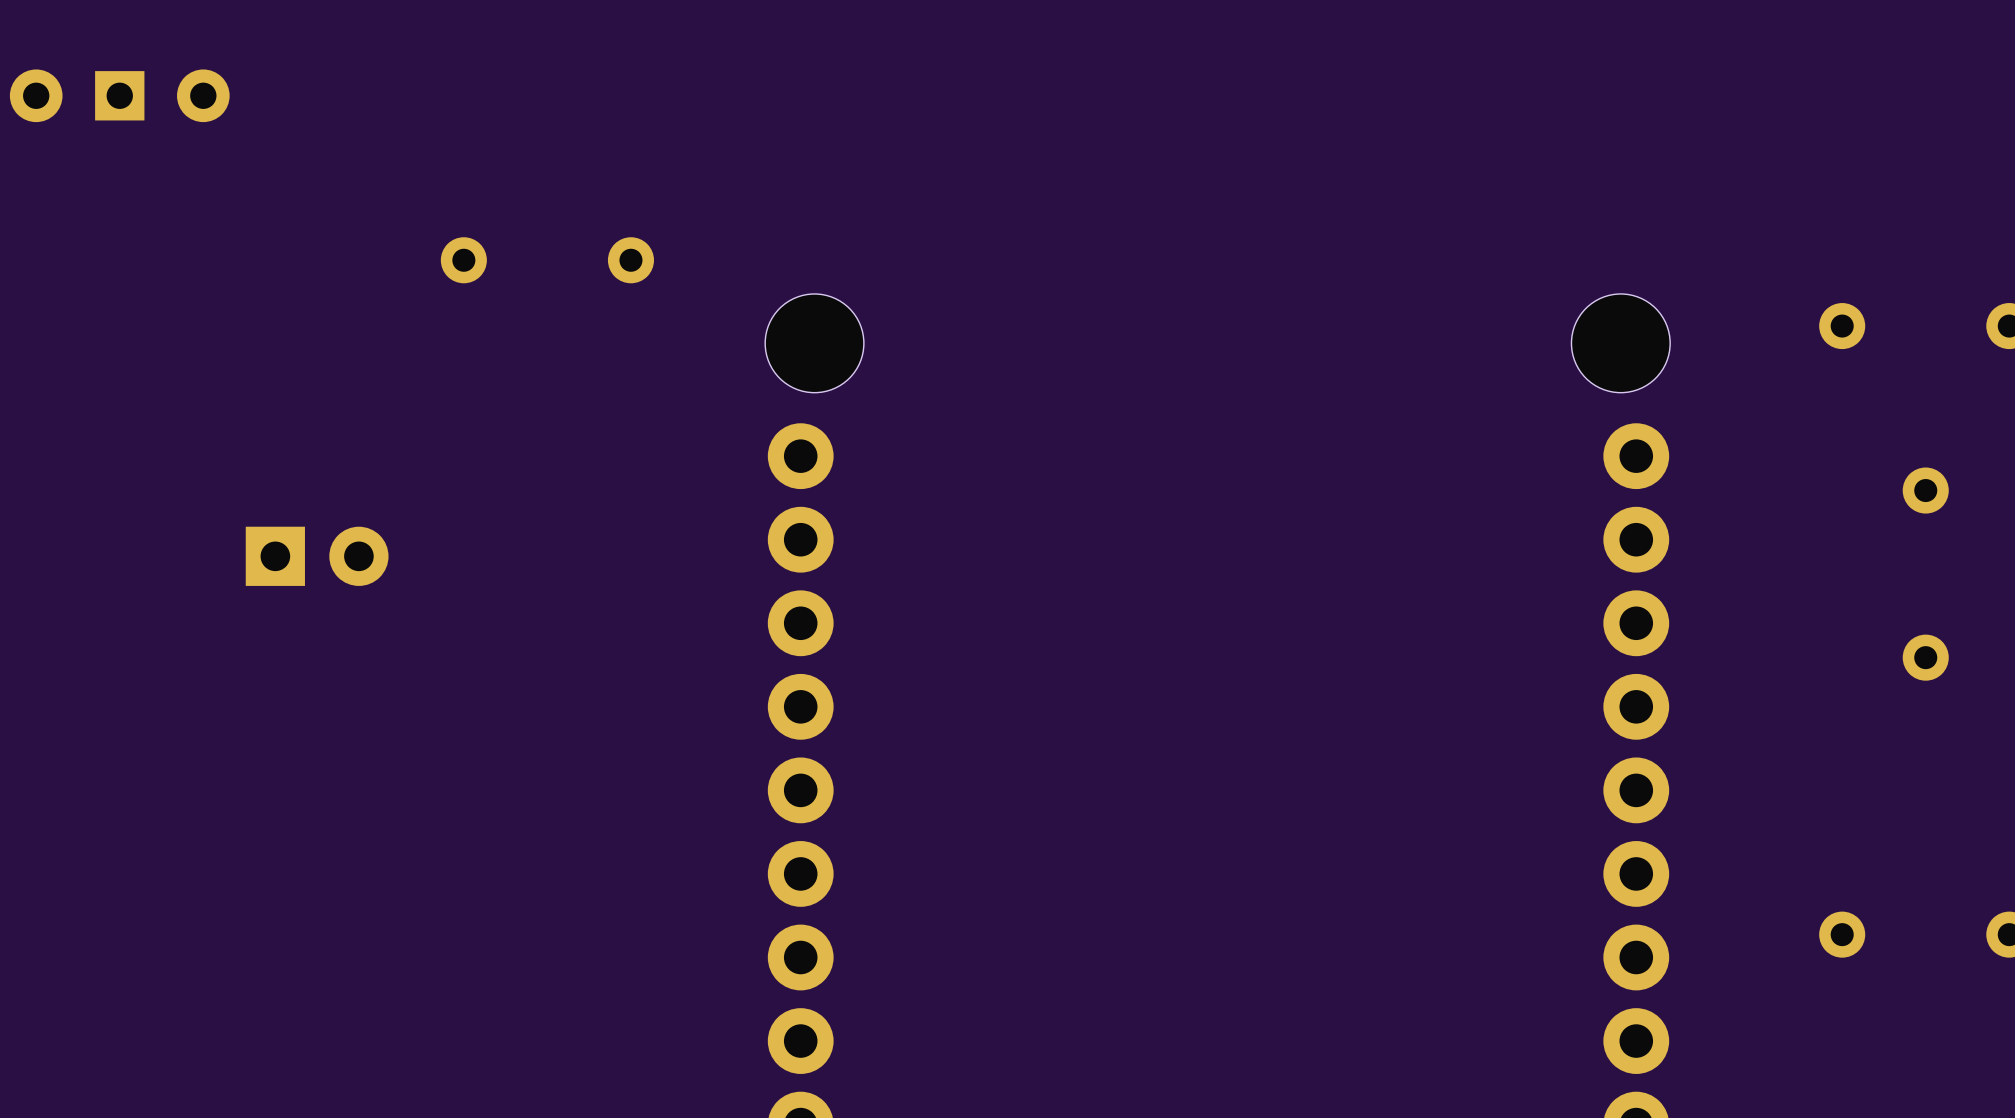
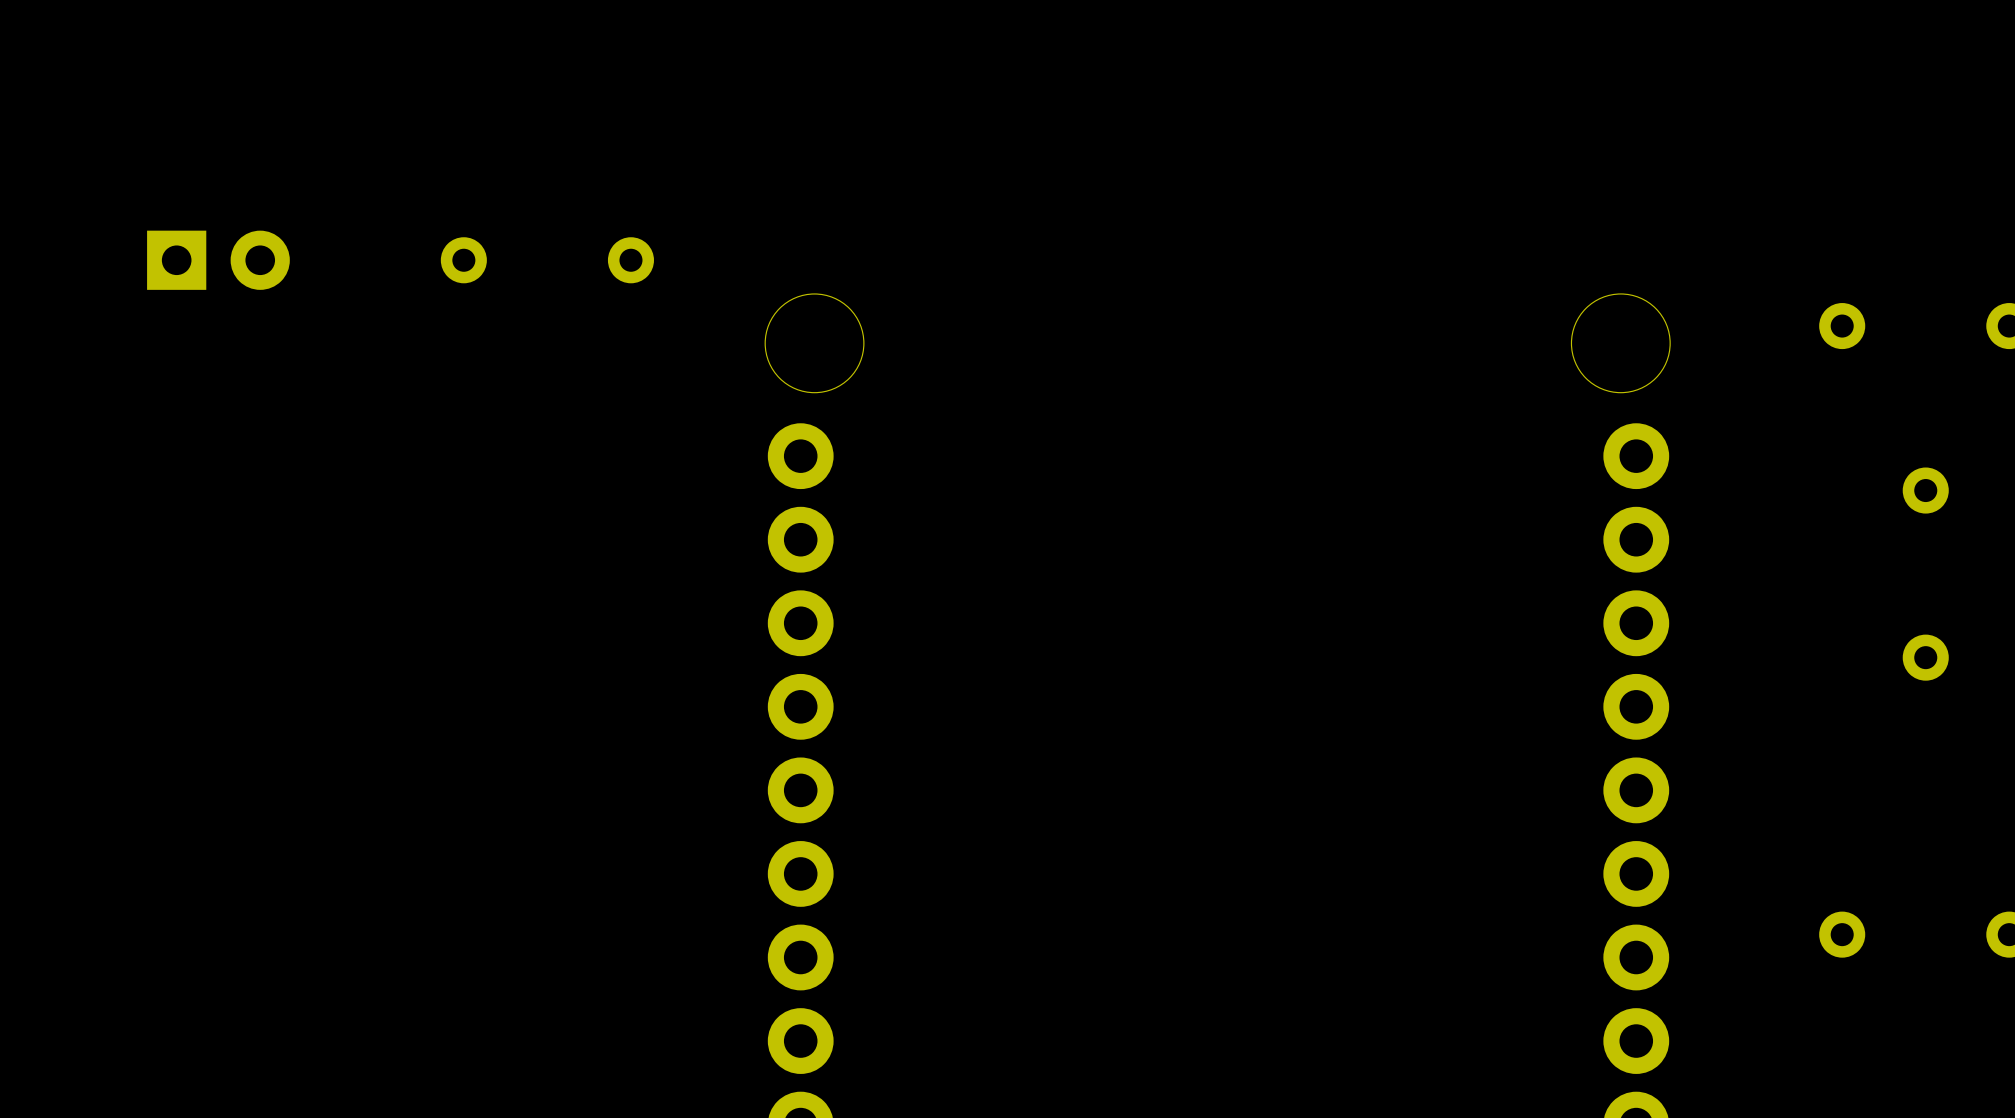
part: (119, 95) -> none
part position: (317, 556) -> (218, 260)

